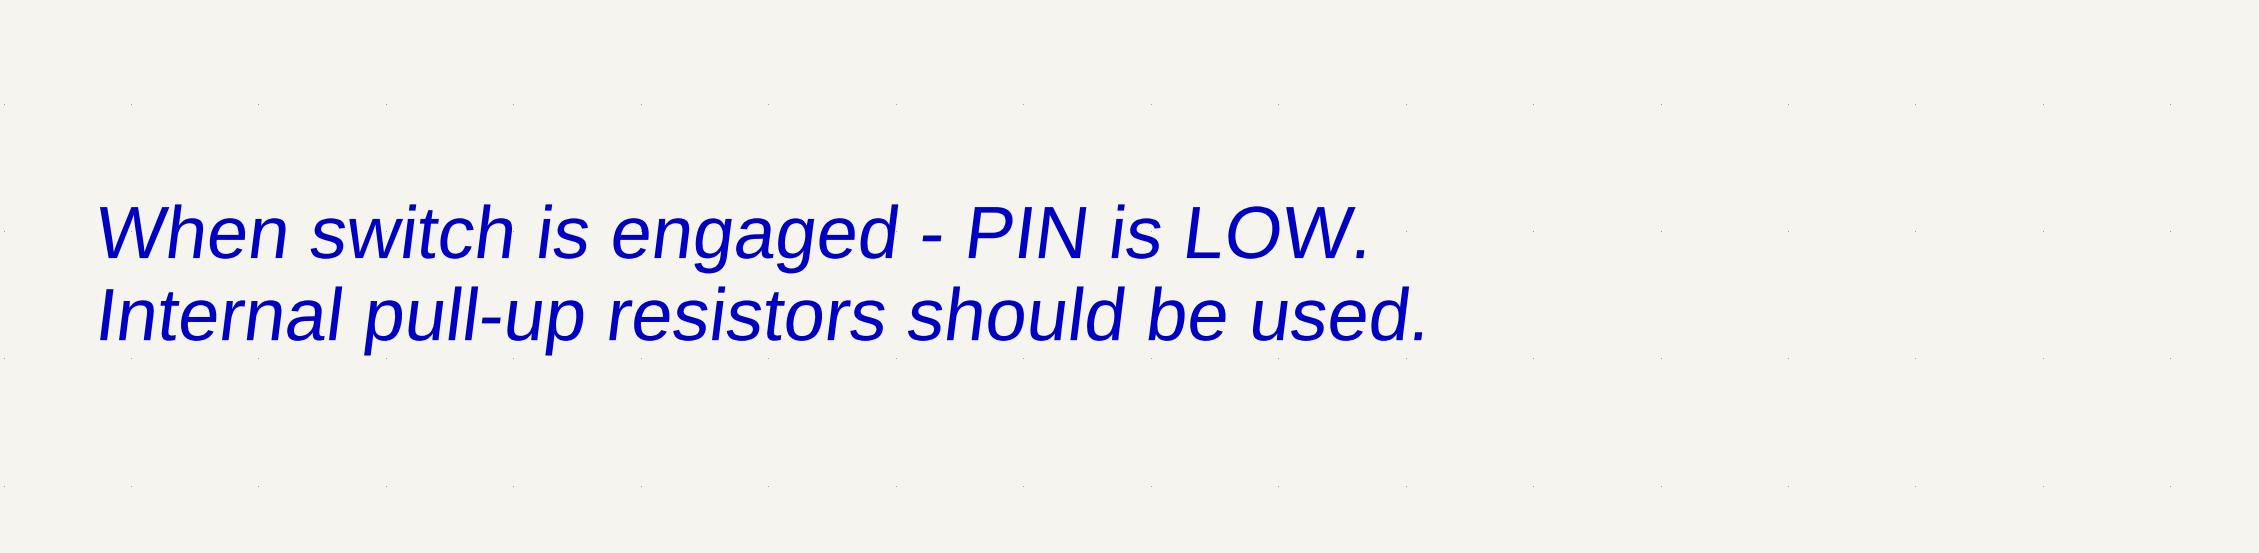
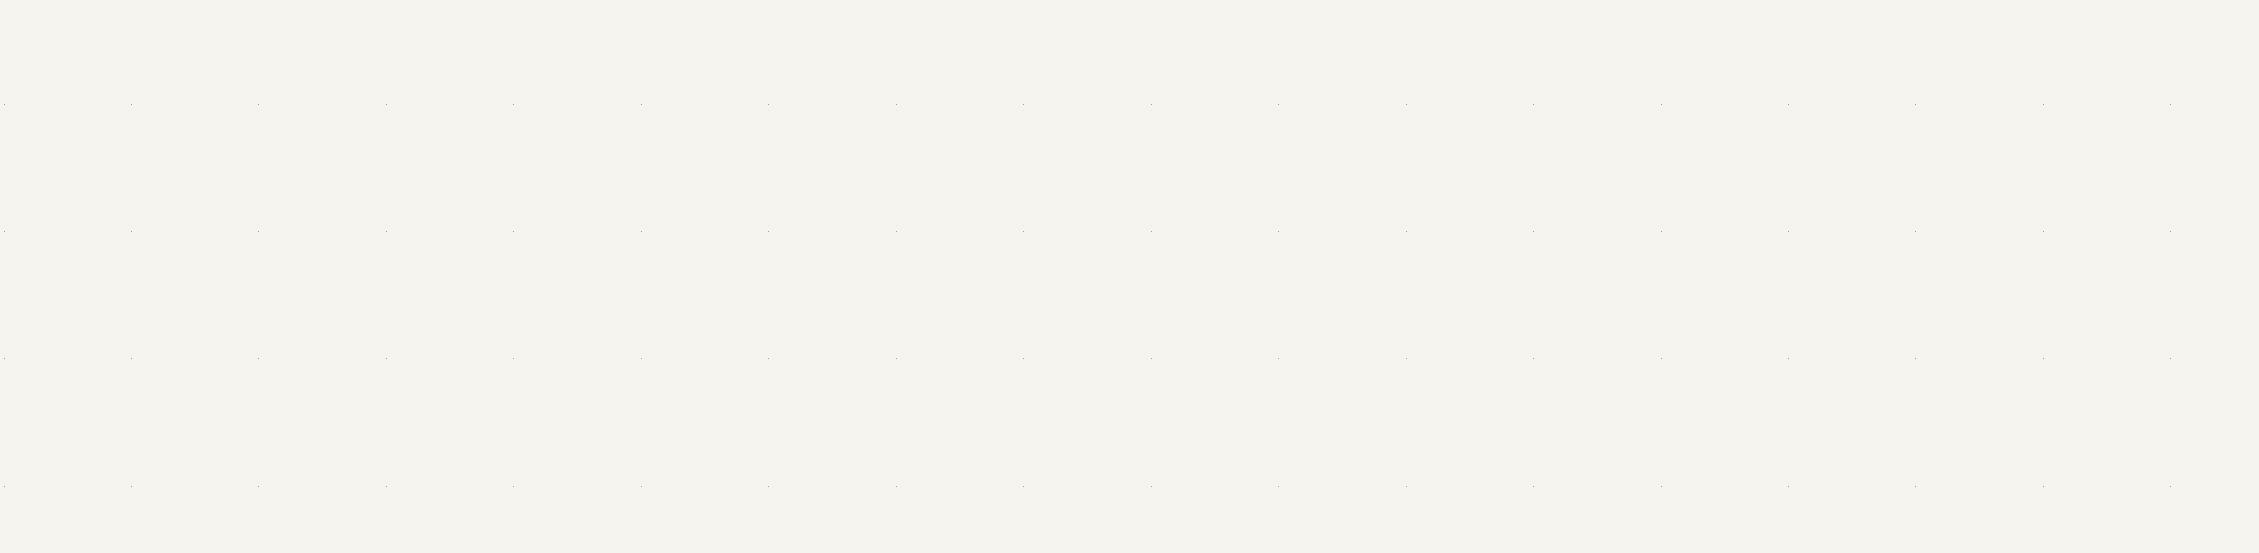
text: When switch is engaged - PIN is LOW. (732, 238) -> none
text: Internal pull-up resistors should be used. (761, 321) -> none

